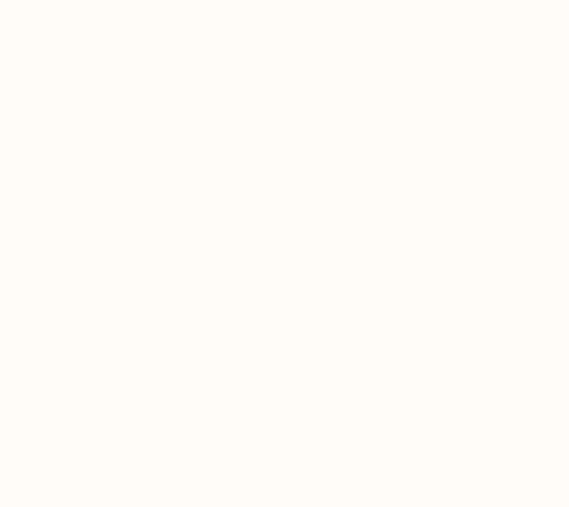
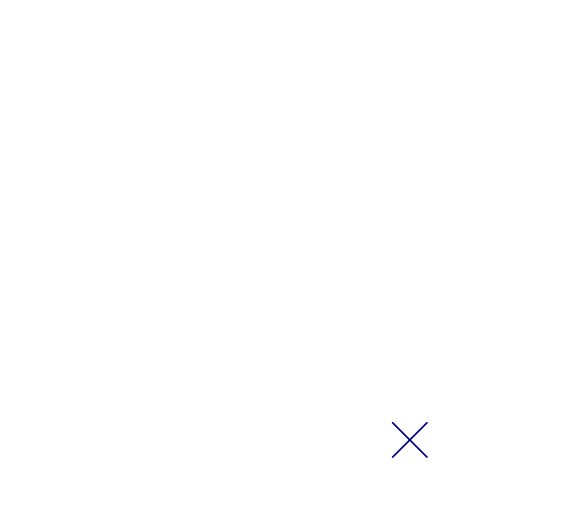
no-connect mark: none -> (409, 439)

